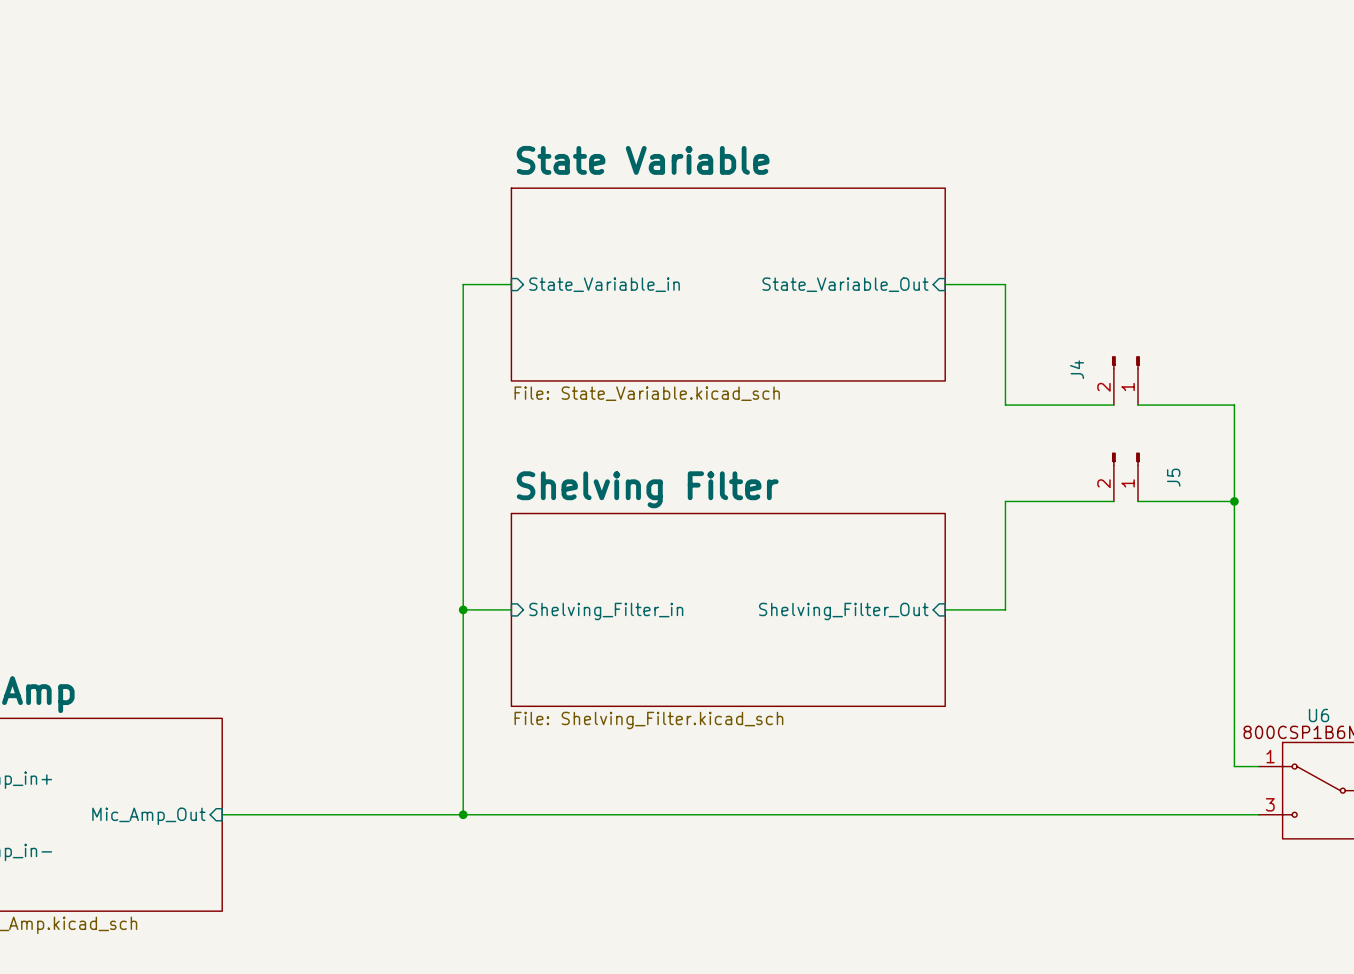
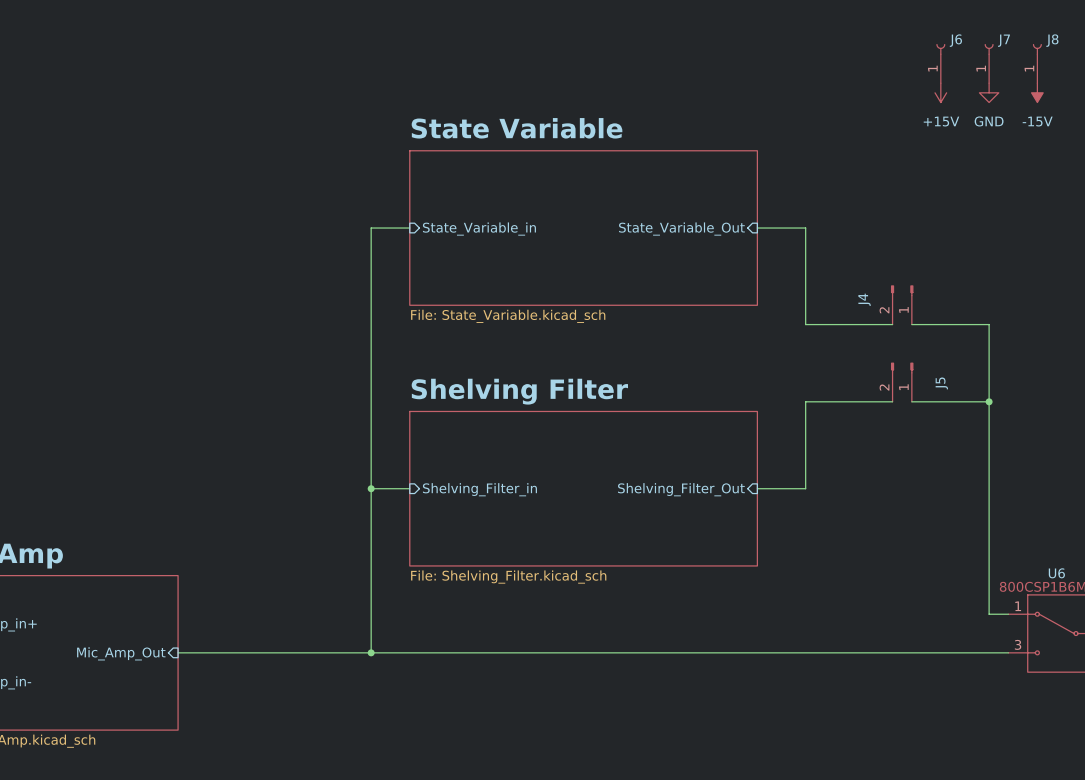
J6: none -> (940, 63)
J7: none -> (989, 63)
J8: none -> (1037, 63)
power symbol: none -> +15V (940, 92)
power symbol: none -> GND (989, 92)
power symbol: none -> -15V (1037, 92)

